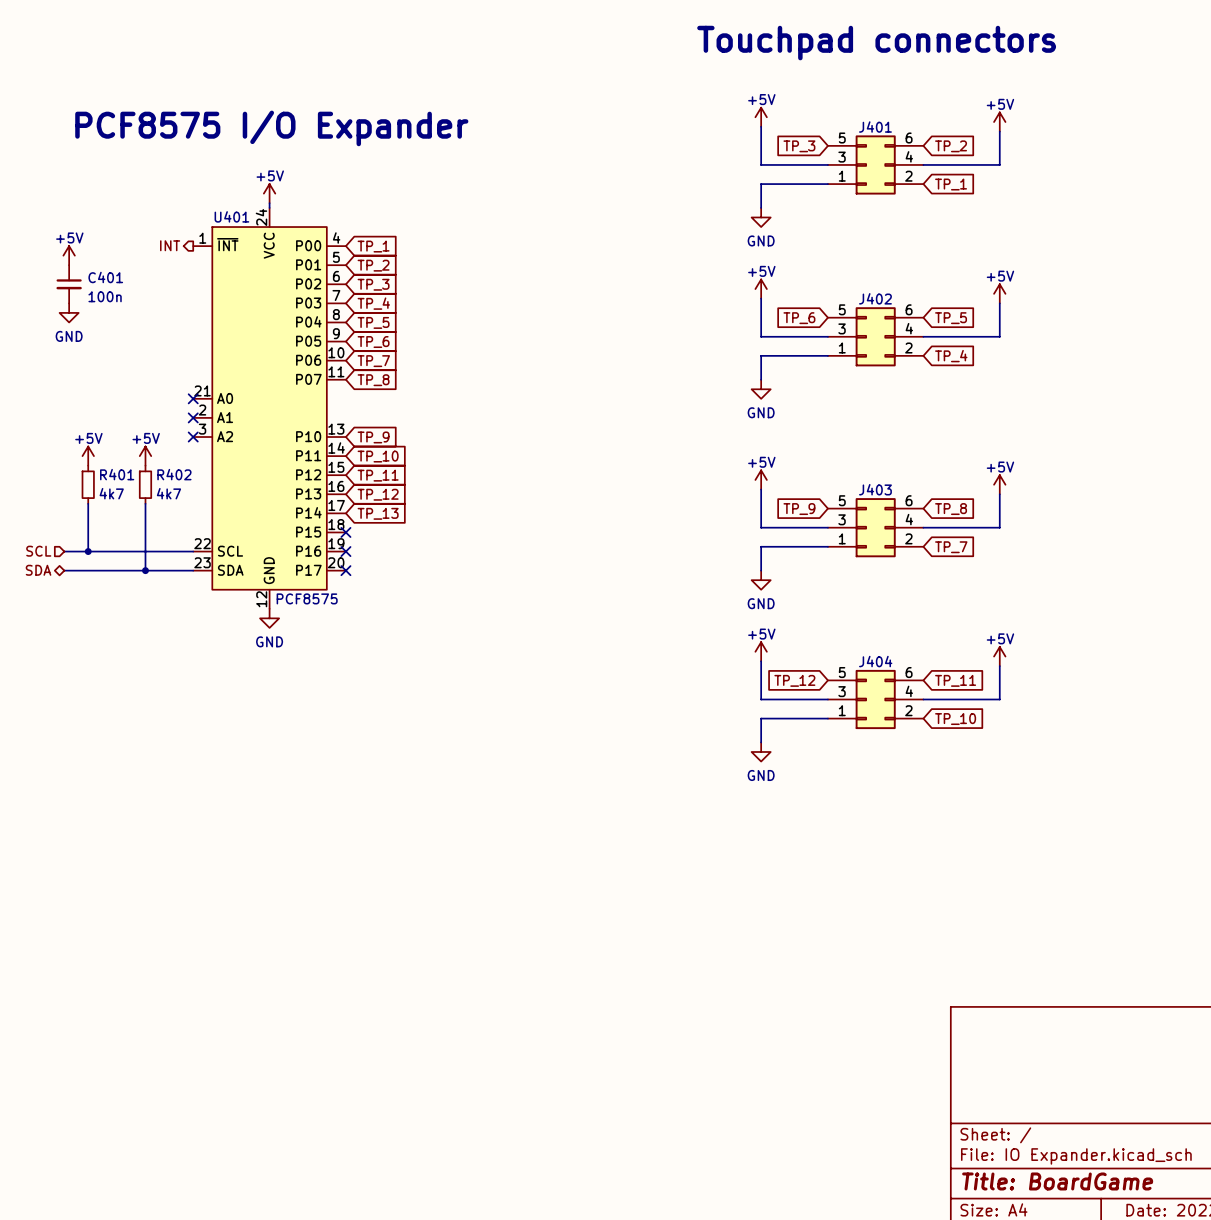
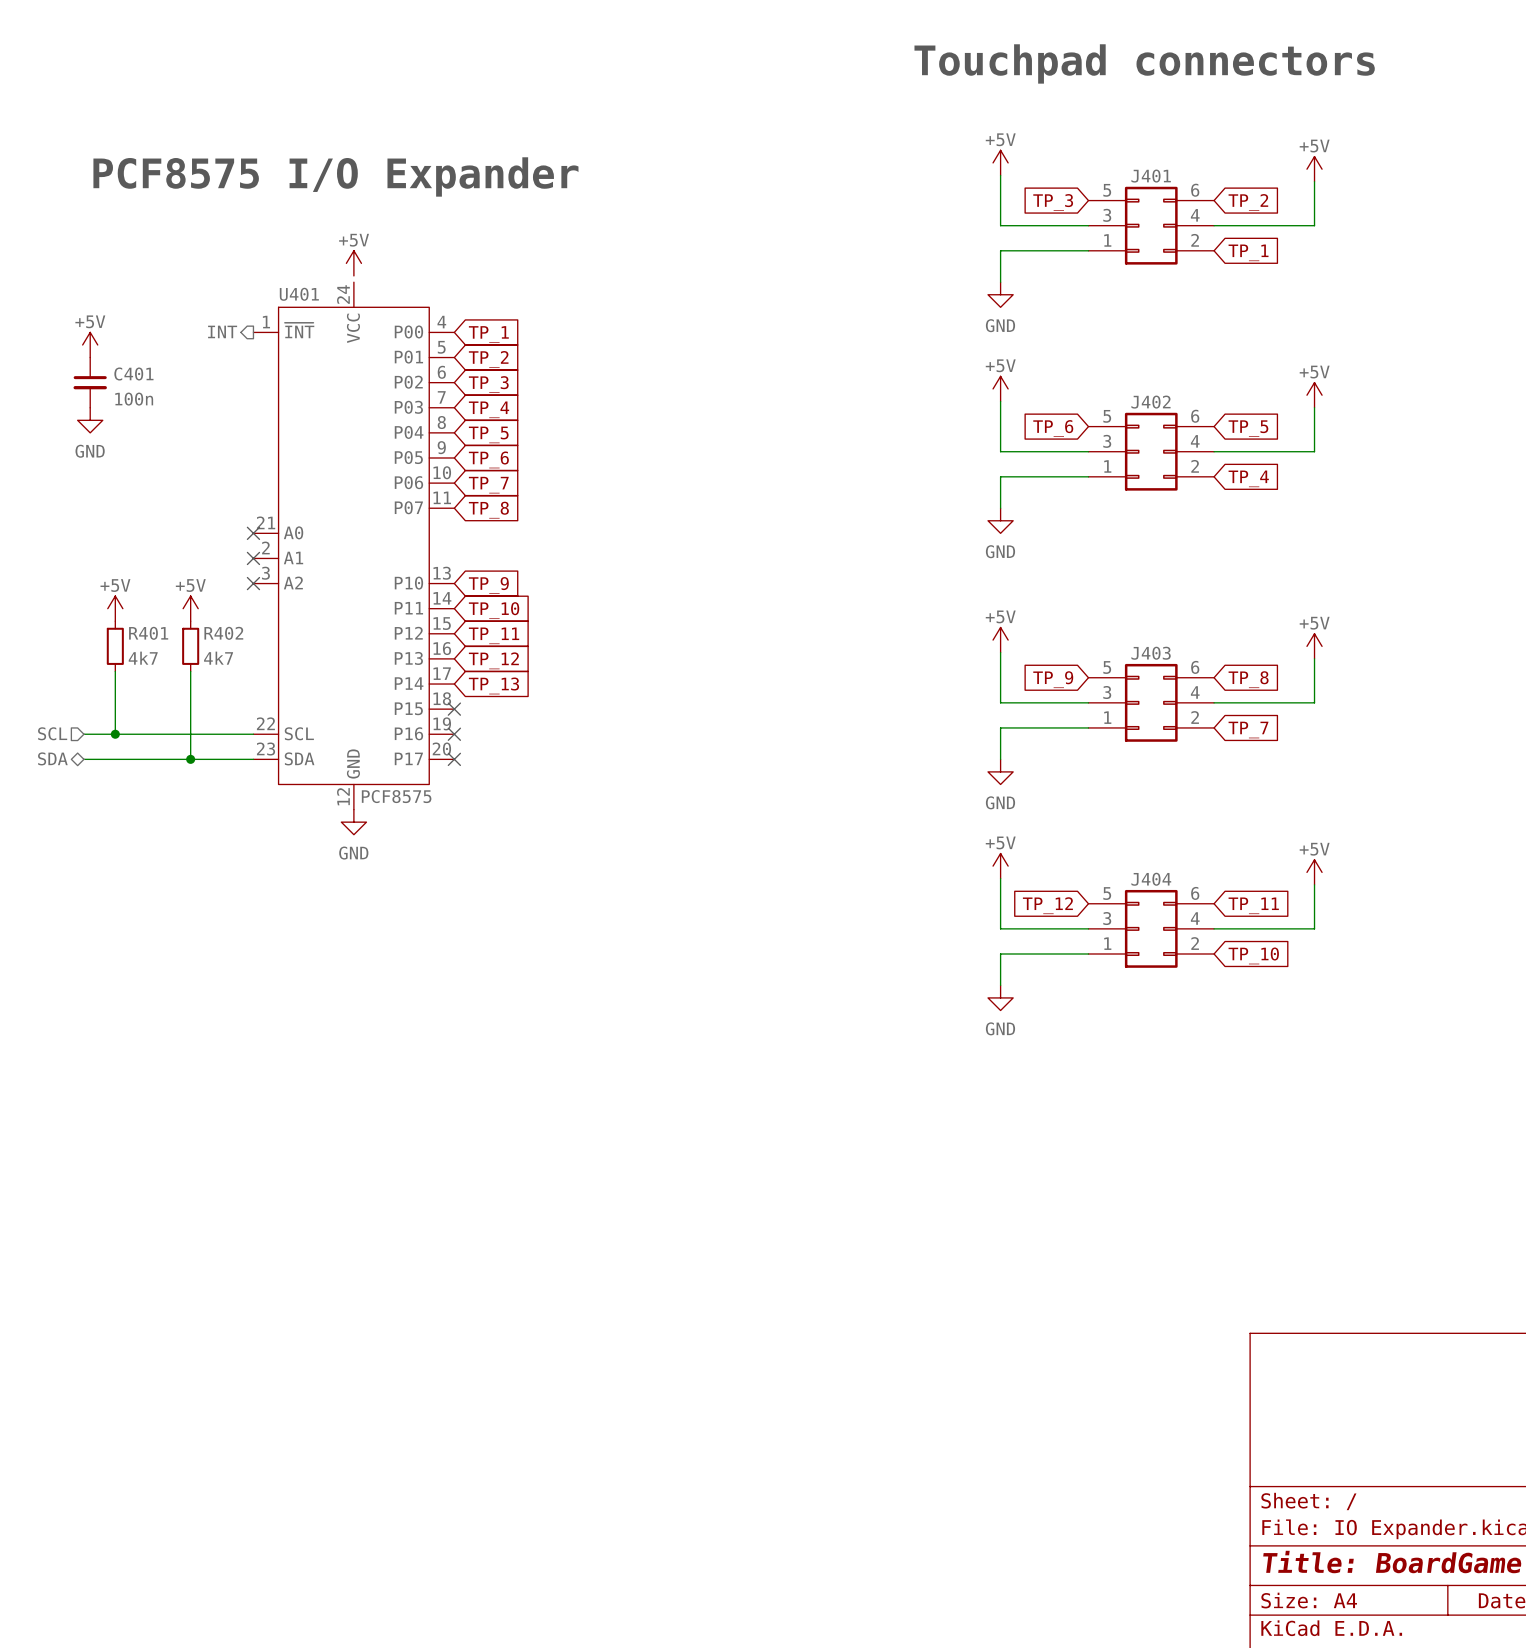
wire: (269, 203) (269, 207) -> none

